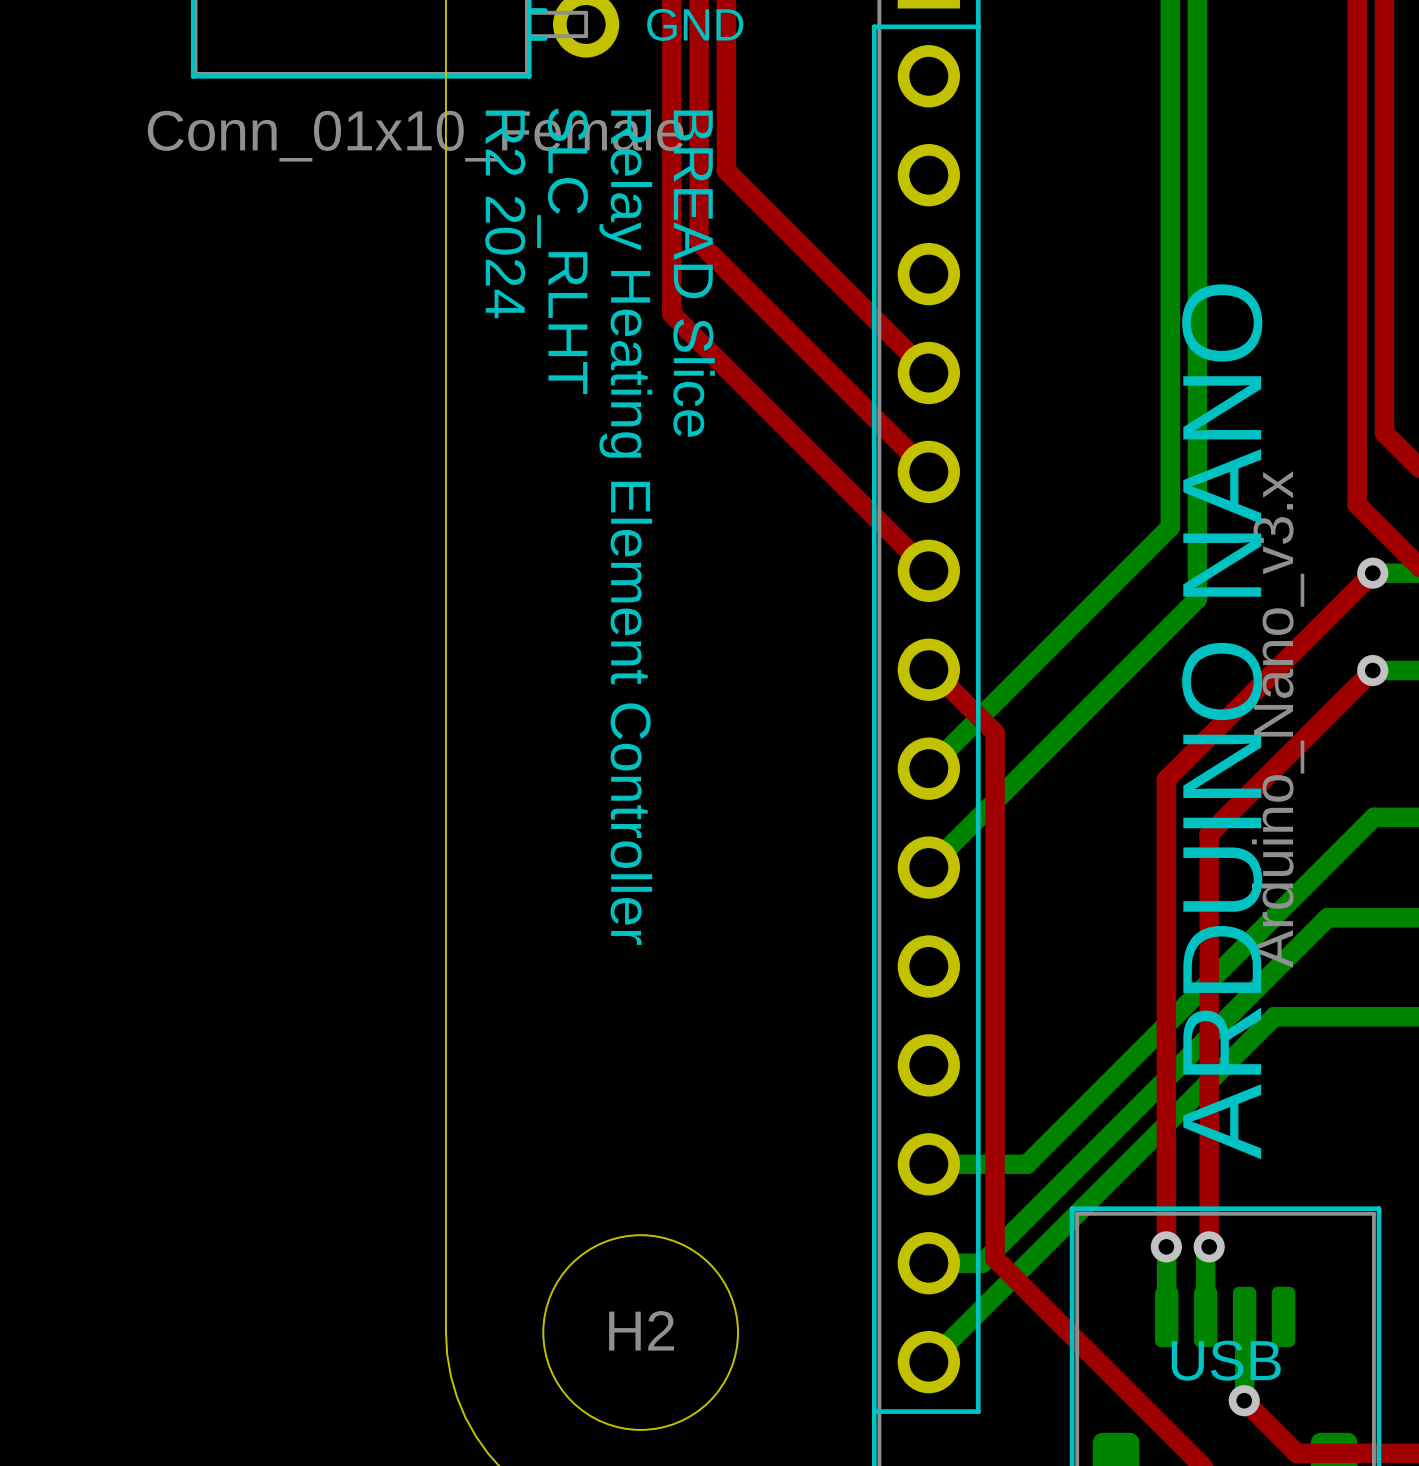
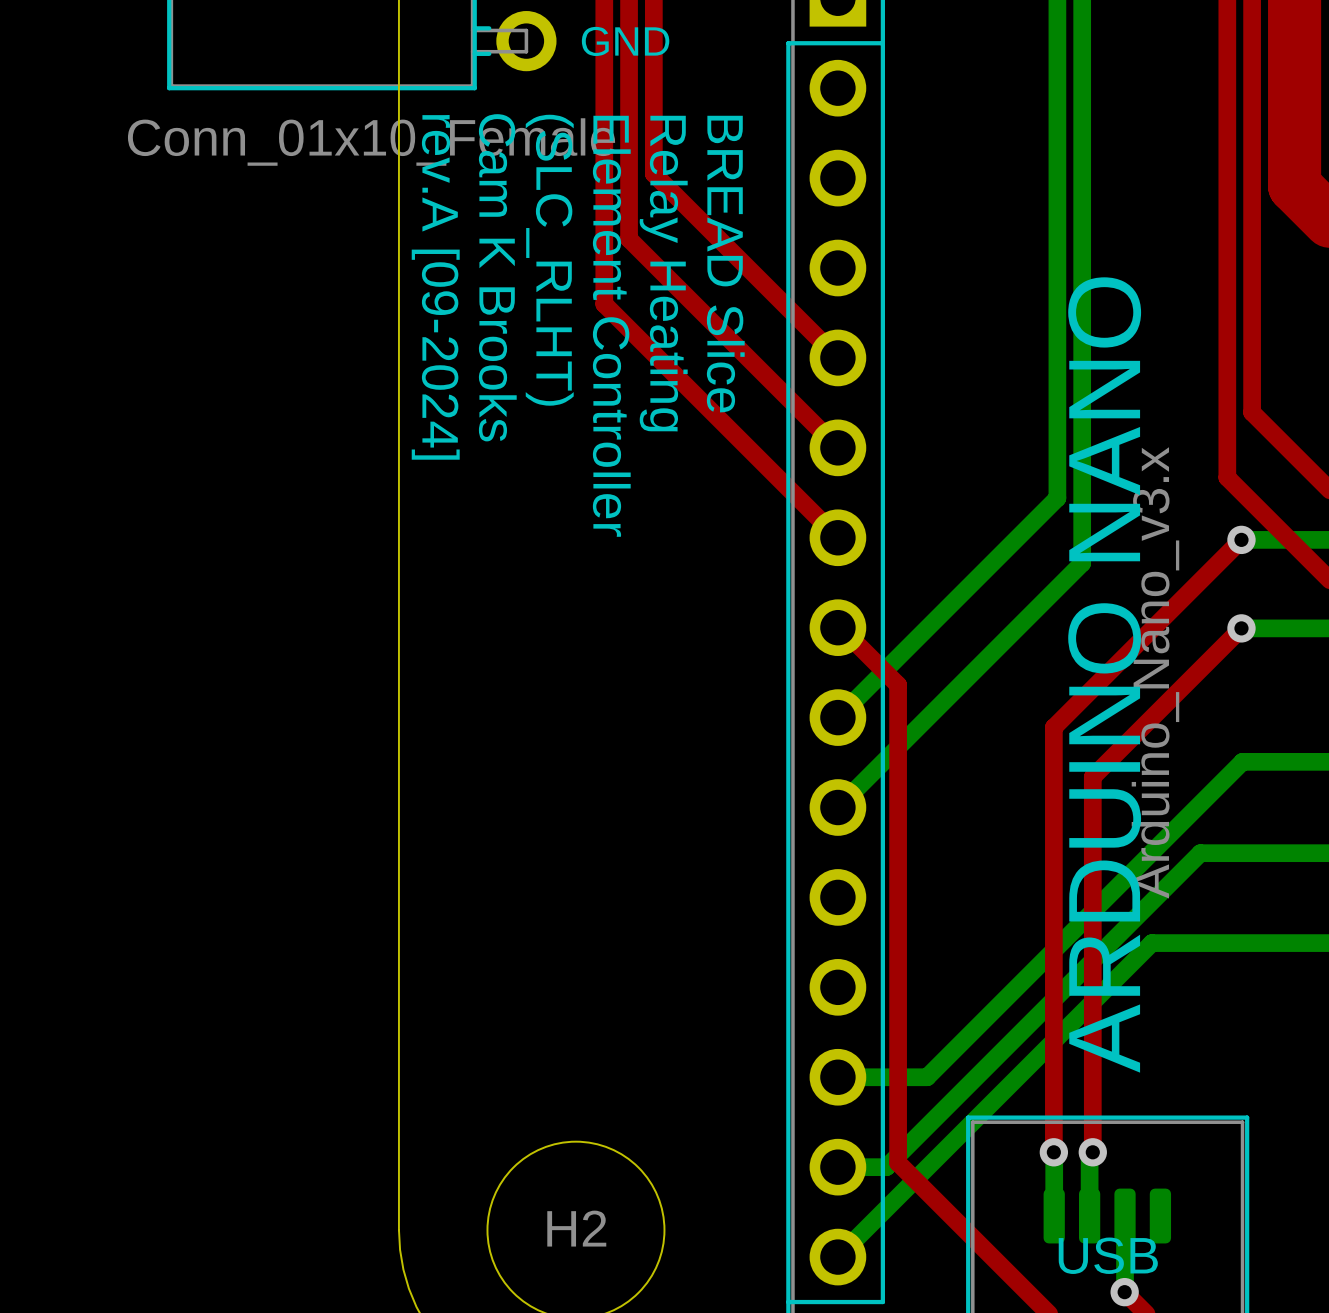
text: R2 2024 (505, 214) -> rev.A [09-2024] (435, 287)
text: SLC_RLHT (562, 251) -> Cam K Brooks (497, 277)
text position: BREAD Slice (694, 273) -> BREAD Slice (725, 264)
text: none -> Relay Heating (663, 273)
text: none -> Element Controller (611, 326)
text: Relay Heating Element Controller (625, 527) -> (SLC_RLHT) (549, 260)

